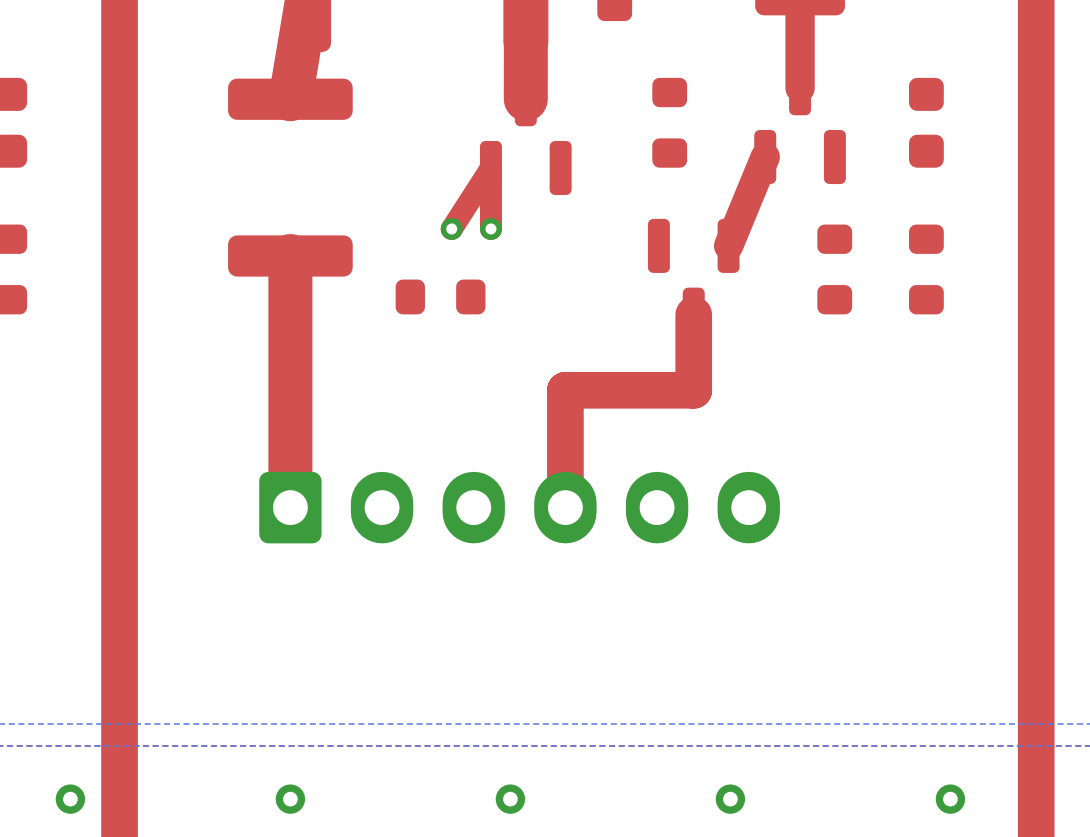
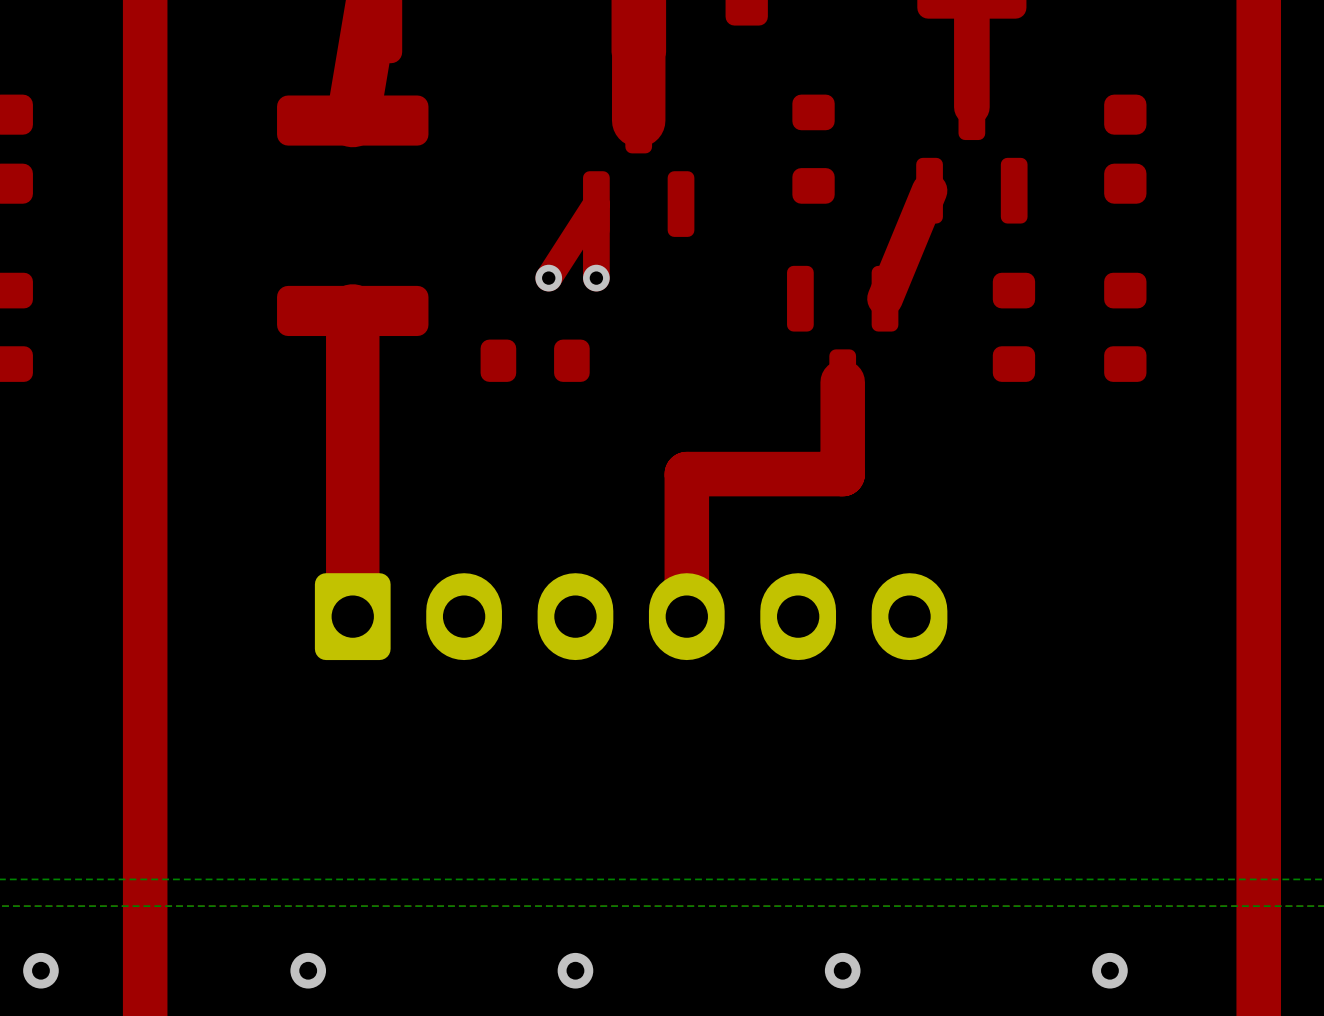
via position: (70, 799) -> (40, 970)
via position: (290, 799) -> (308, 970)
via position: (510, 799) -> (575, 970)
via position: (730, 799) -> (842, 970)
via position: (950, 799) -> (1109, 970)

